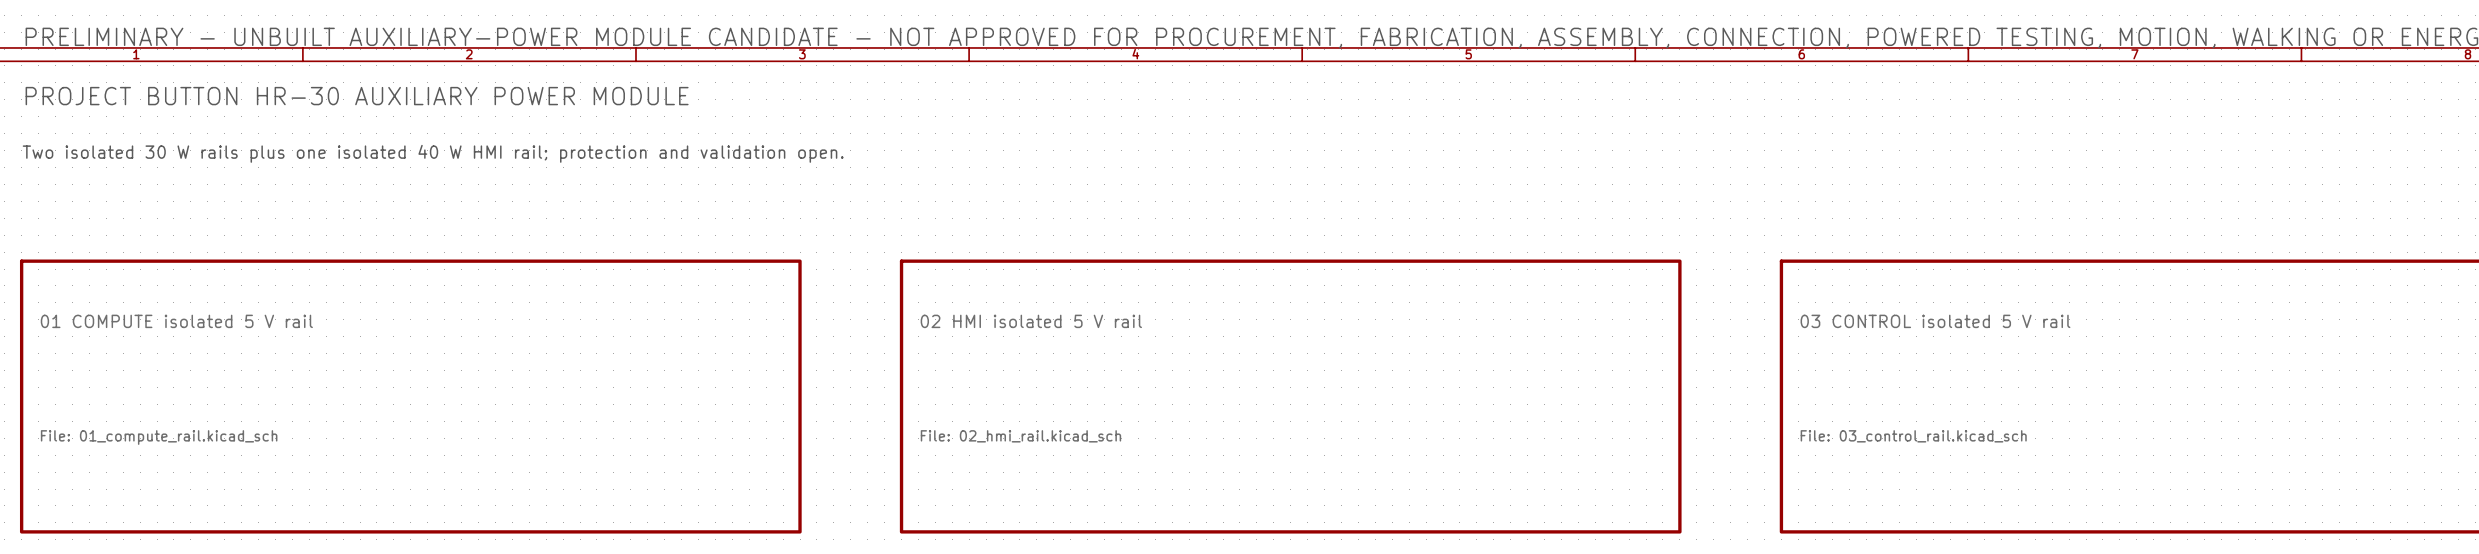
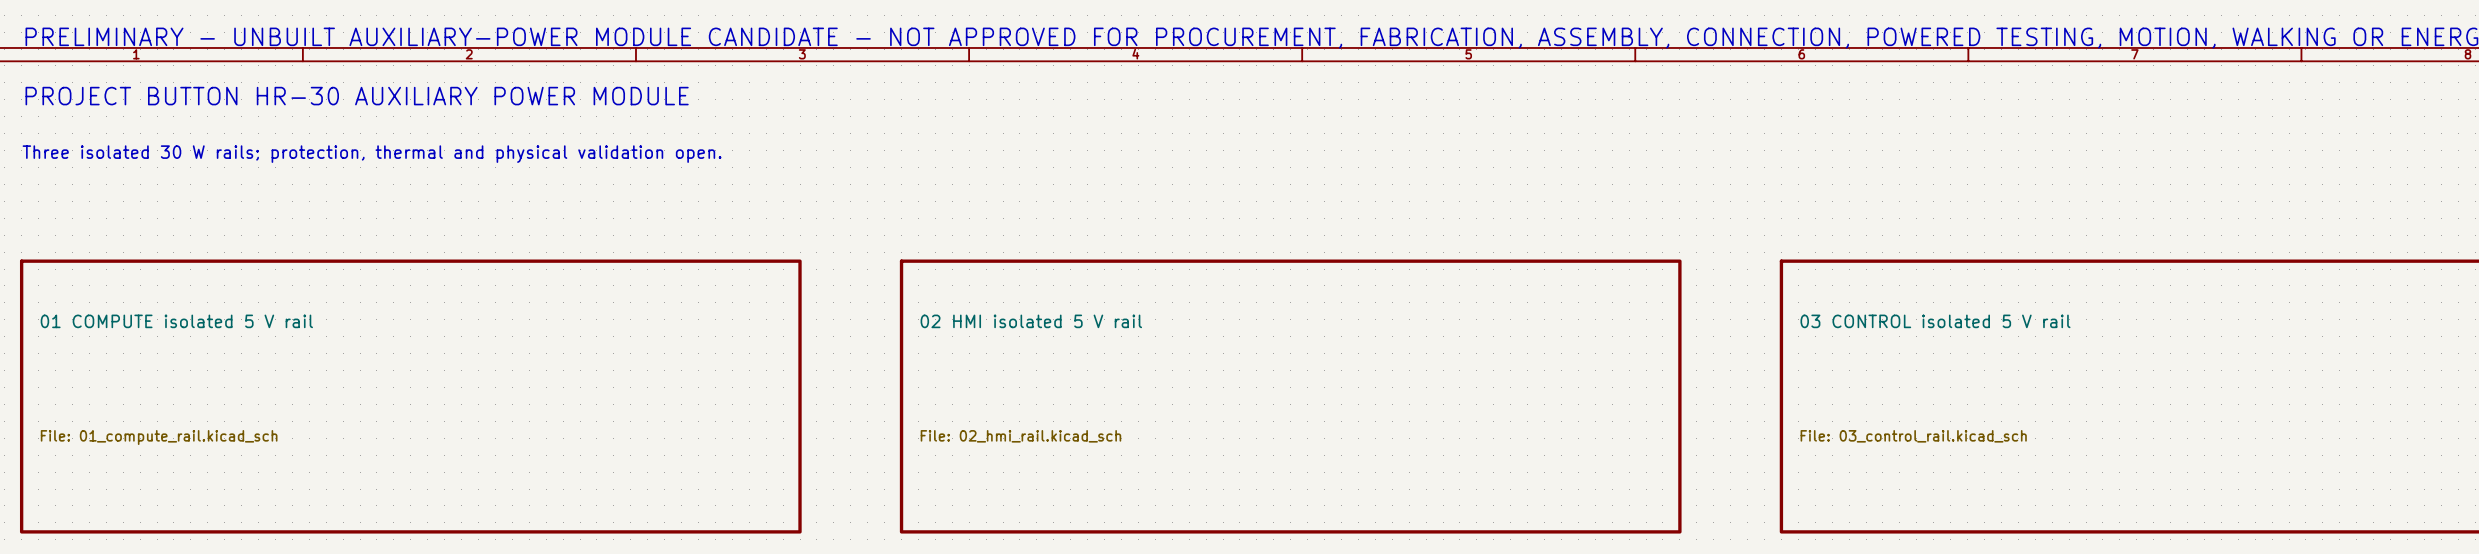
text: Two isolated 30 W rails plus one isolated 40 W HMI rail; protection and validation open. (433, 153) -> Three isolated 30 W rails; protection, thermal and physical validation open. (372, 154)

